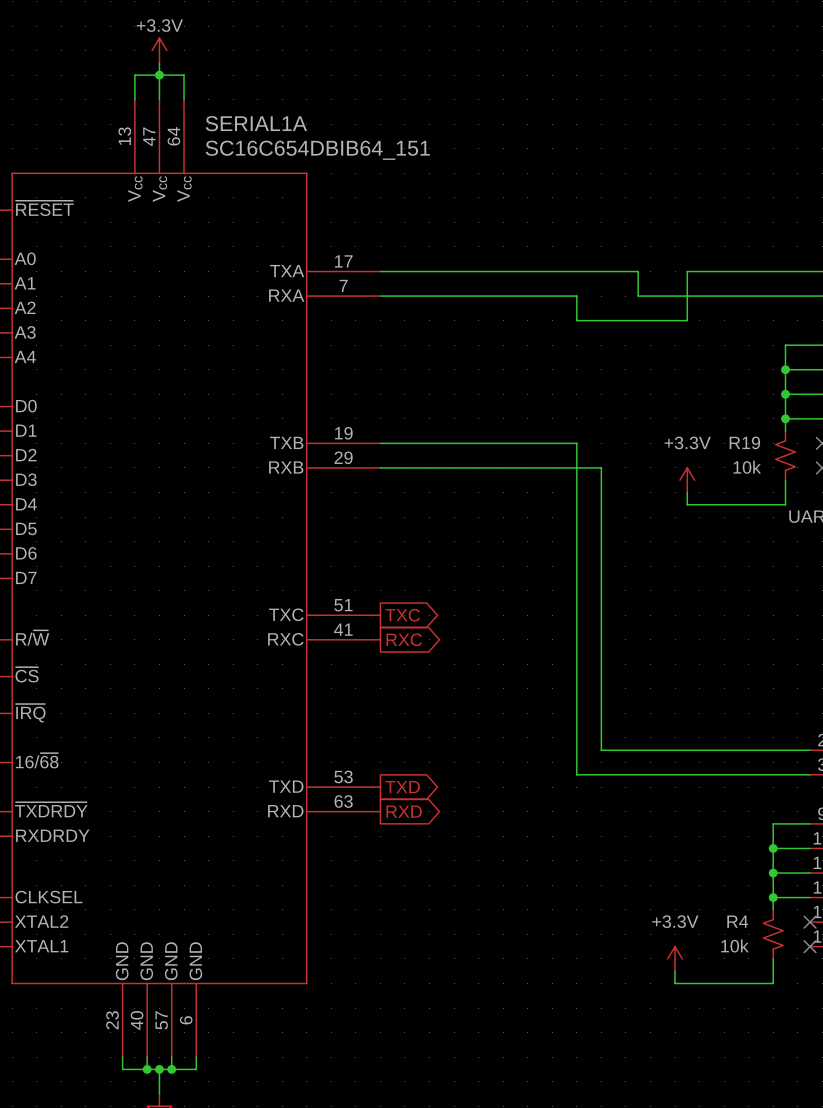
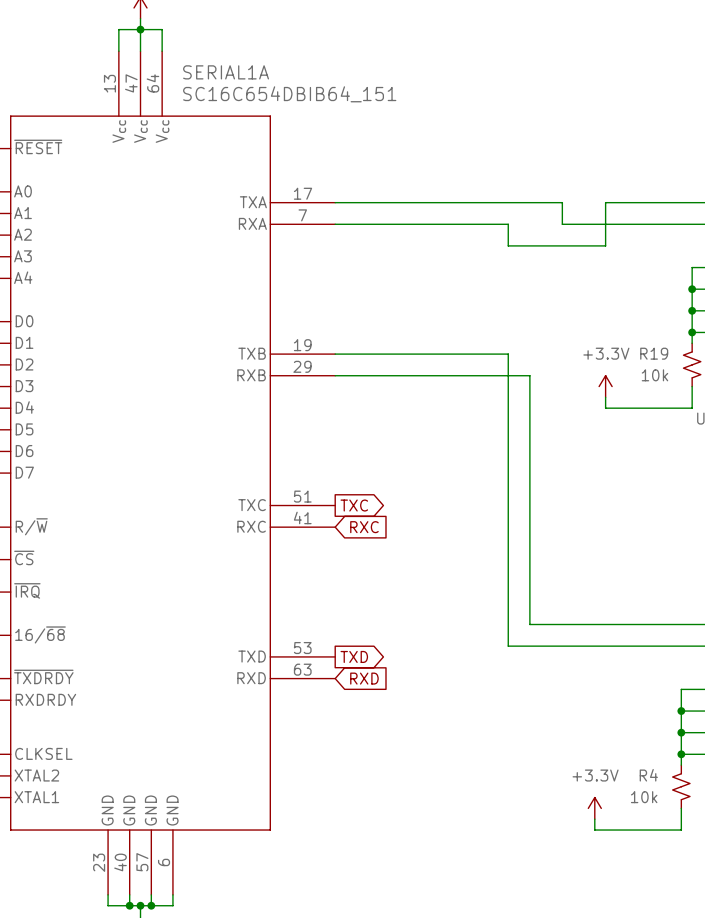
global label shape: output (404, 639) -> input (364, 527)
global label shape: output (404, 811) -> input (364, 678)

